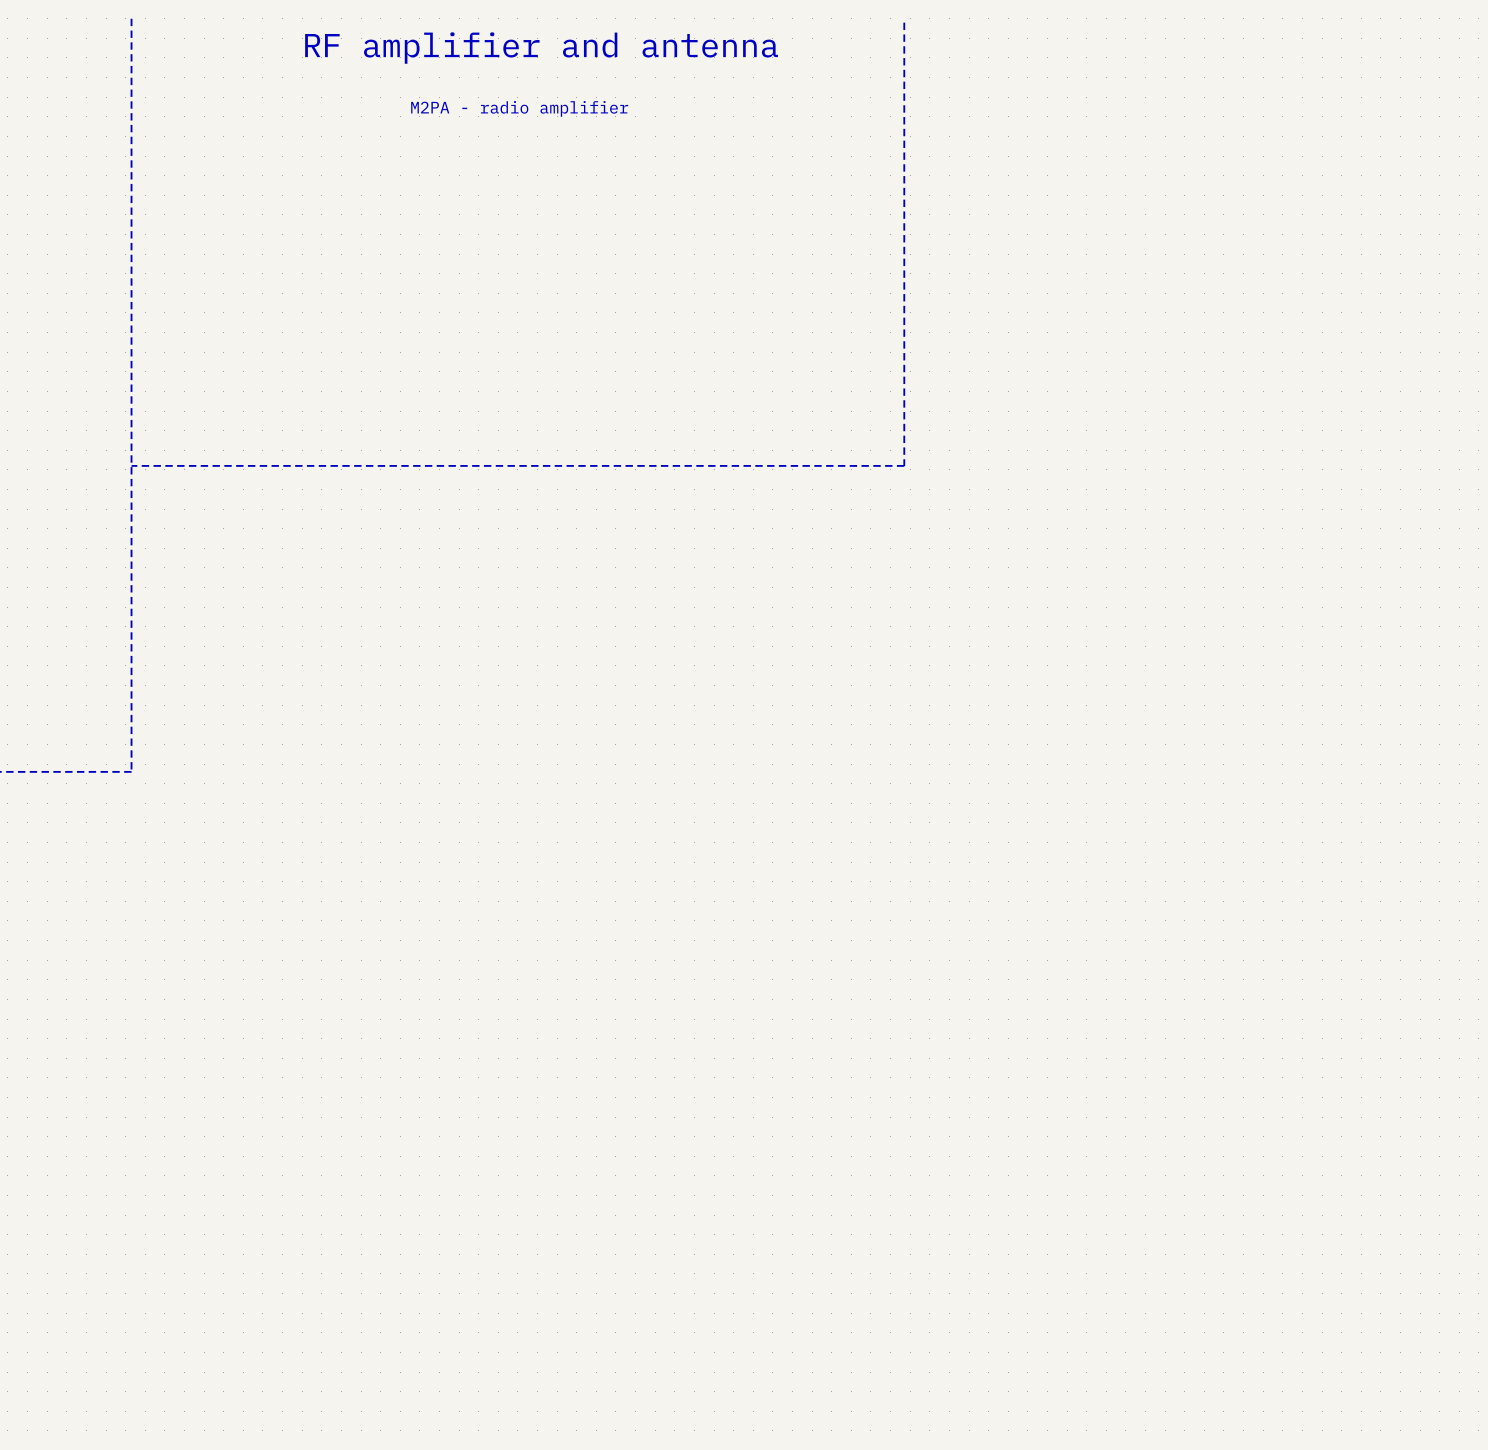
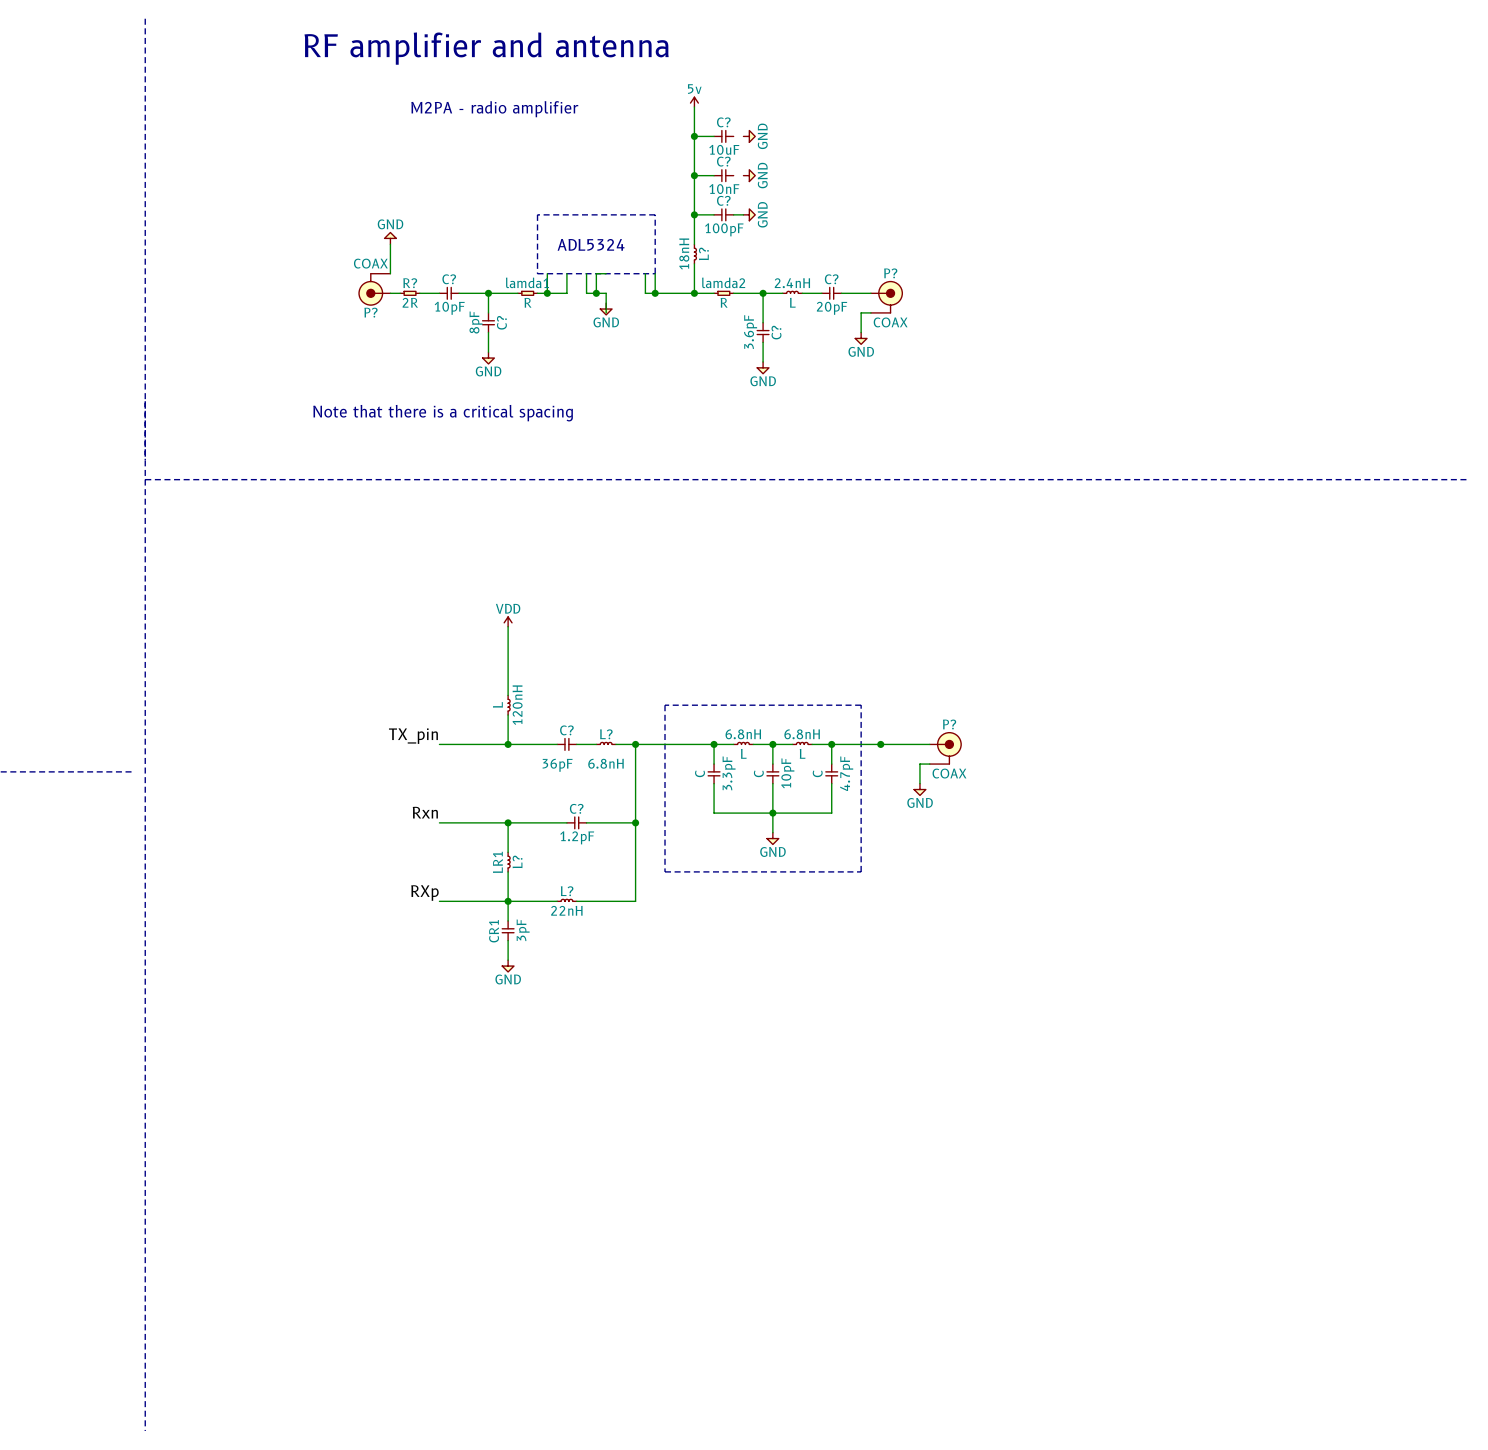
line: (131, 18) (131, 771) -> none
line: none -> (145, 18) (145, 1430)
line: (904, 22) (904, 465) (131, 465) -> none
power symbol: none -> 5v (694, 102)
wire: none -> (694, 107) (694, 244)
wire: none -> (694, 136) (714, 136)
junction: none -> (694, 136)
C?: none -> 10uF (723, 136)
power symbol: none -> GND (749, 136)
wire: none -> (694, 175) (714, 175)
junction: none -> (694, 175)
C?: none -> 10nF (723, 175)
power symbol: none -> GND (749, 175)
line: none -> (537, 214) (537, 273) (655, 273) (655, 214) (537, 214)
wire: none -> (694, 214) (714, 214)
junction: none -> (694, 214)
C?: none -> 100pF (723, 214)
wire: none -> (733, 214) (743, 214)
power symbol: none -> GND (749, 214)
power symbol: none -> GND (390, 238)
wire: none -> (390, 244) (390, 273)
text: none -> ADL5324 (591, 244)
L?: none -> 18nH (695, 254)
wire: none -> (694, 263) (694, 293)
wire: none -> (547, 273) (547, 293)
wire: none -> (566, 273) (566, 293) (537, 293)
wire: none -> (586, 273) (586, 293) (606, 293) (606, 312)
wire: none -> (606, 273) (596, 273) (596, 293)
wire: none -> (645, 273) (645, 293) (714, 293)
wire: none -> (655, 273) (655, 293)
P?: none -> COAX (374, 289)
2.4nH: none -> L (792, 292)
wire: none -> (390, 293) (400, 293)
R?: none -> 2R (410, 293)
wire: none -> (419, 293) (439, 293)
C?: none -> 10pF (449, 293)
wire: none -> (459, 293) (517, 293)
wire: none -> (488, 293) (488, 312)
junction: none -> (488, 293)
lamda1: none -> R (527, 293)
junction: none -> (547, 293)
junction: none -> (596, 293)
junction: none -> (655, 293)
junction: none -> (694, 293)
lamda2: none -> R (723, 293)
wire: none -> (733, 293) (782, 293)
wire: none -> (763, 293) (763, 322)
junction: none -> (763, 293)
wire: none -> (802, 293) (821, 293)
C?: none -> 20pF (831, 293)
wire: none -> (841, 293) (870, 293)
P?: none -> COAX (886, 297)
power symbol: none -> GND (606, 309)
wire: none -> (870, 312) (861, 312) (861, 332)
C?: none -> 8pF (488, 322)
wire: none -> (488, 332) (488, 352)
C?: none -> 3.6pF (763, 332)
power symbol: none -> GND (861, 338)
wire: none -> (763, 342) (763, 361)
power symbol: none -> GND (488, 358)
power symbol: none -> GND (763, 367)
text: none -> Note that there is a critical spacing (443, 413)
line: none -> (145, 479) (1469, 479)
power symbol: none -> VDD (508, 621)
wire: none -> (508, 626) (508, 695)
120nH: none -> L (509, 705)
line: none -> (665, 705) (861, 705) (861, 871) (665, 871) (665, 705)
wire: none -> (508, 715) (508, 744)
label: none -> TX_pin (413, 736)
L?: none -> 6.8nH (606, 743)
6.8nH: none -> L (743, 743)
6.8nH: none -> L (802, 743)
wire: none -> (439, 744) (557, 744)
junction: none -> (508, 744)
C?: none -> 36pF (566, 744)
wire: none -> (576, 744) (596, 744)
wire: none -> (615, 744) (733, 744)
wire: none -> (635, 744) (635, 901) (576, 901)
junction: none -> (635, 744)
wire: none -> (714, 744) (714, 764)
junction: none -> (714, 744)
wire: none -> (753, 744) (792, 744)
wire: none -> (772, 744) (772, 764)
junction: none -> (772, 744)
wire: none -> (812, 744) (929, 744)
wire: none -> (831, 744) (831, 764)
junction: none -> (831, 744)
junction: none -> (880, 744)
P?: none -> COAX (945, 748)
wire: none -> (929, 764) (919, 764) (919, 783)
3.3pF: none -> C (714, 773)
10pF: none -> C (772, 773)
4.7pF: none -> C (831, 773)
wire: none -> (714, 783) (714, 813) (831, 813) (831, 783)
wire: none -> (772, 783) (772, 832)
power symbol: none -> GND (919, 789)
label: none -> Rxn (425, 812)
junction: none -> (772, 813)
wire: none -> (439, 822) (566, 822)
wire: none -> (508, 822) (508, 852)
junction: none -> (508, 822)
C?: none -> 1.2pF (576, 822)
wire: none -> (586, 822) (635, 822)
junction: none -> (635, 822)
power symbol: none -> GND (772, 838)
L?: none -> LR1 (509, 862)
wire: none -> (508, 871) (508, 920)
label: none -> RXp (424, 893)
L?: none -> 22nH (566, 900)
wire: none -> (439, 901) (557, 901)
junction: none -> (508, 901)
3pF: none -> CR1 (508, 930)
wire: none -> (508, 940) (508, 960)
power symbol: none -> GND (508, 966)

